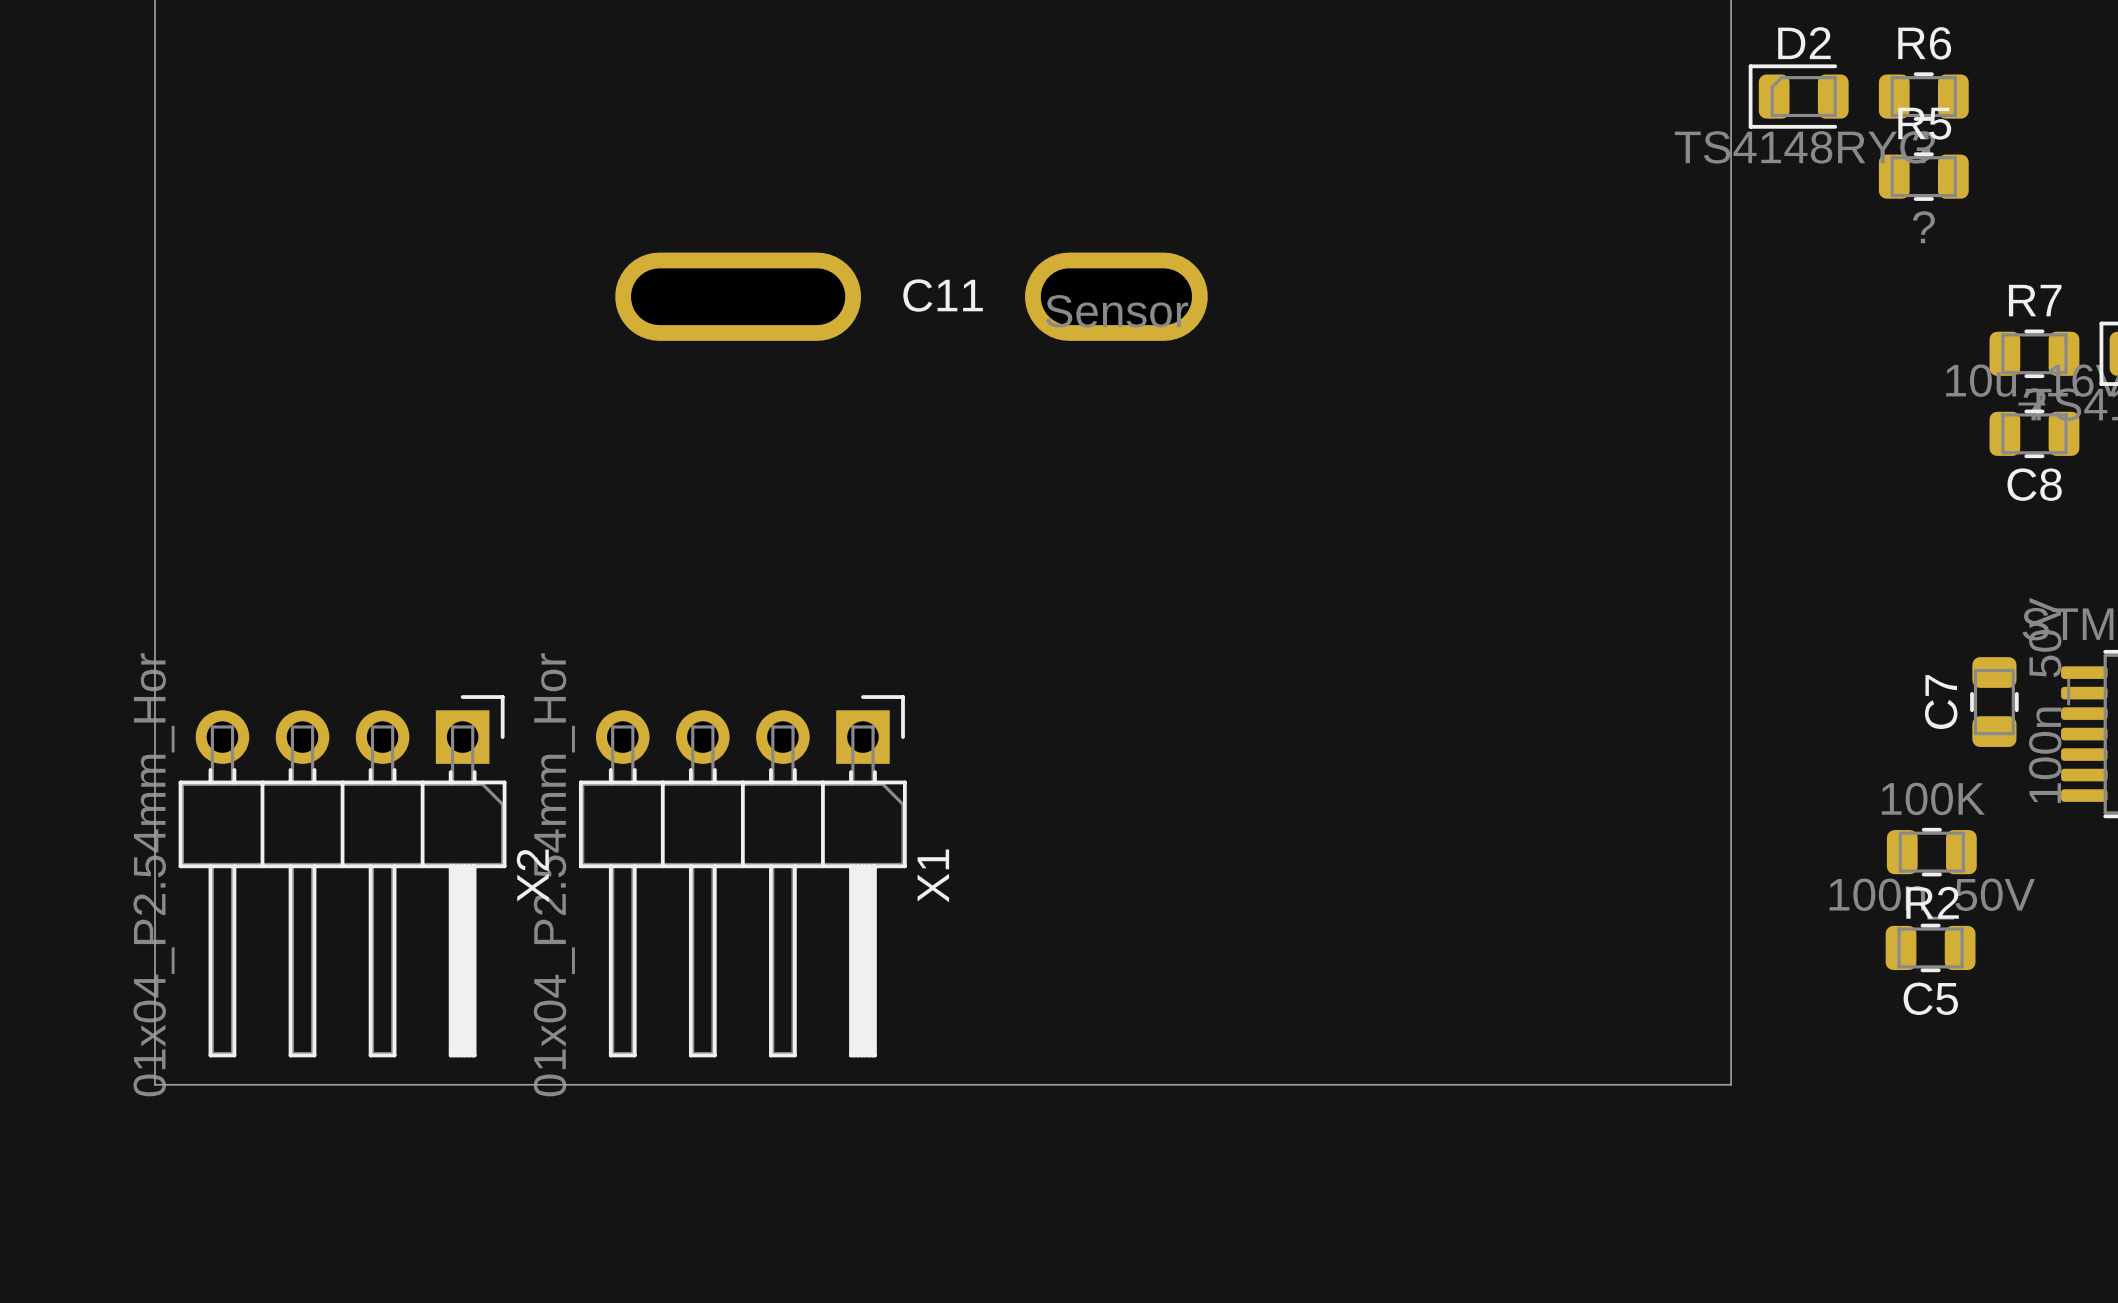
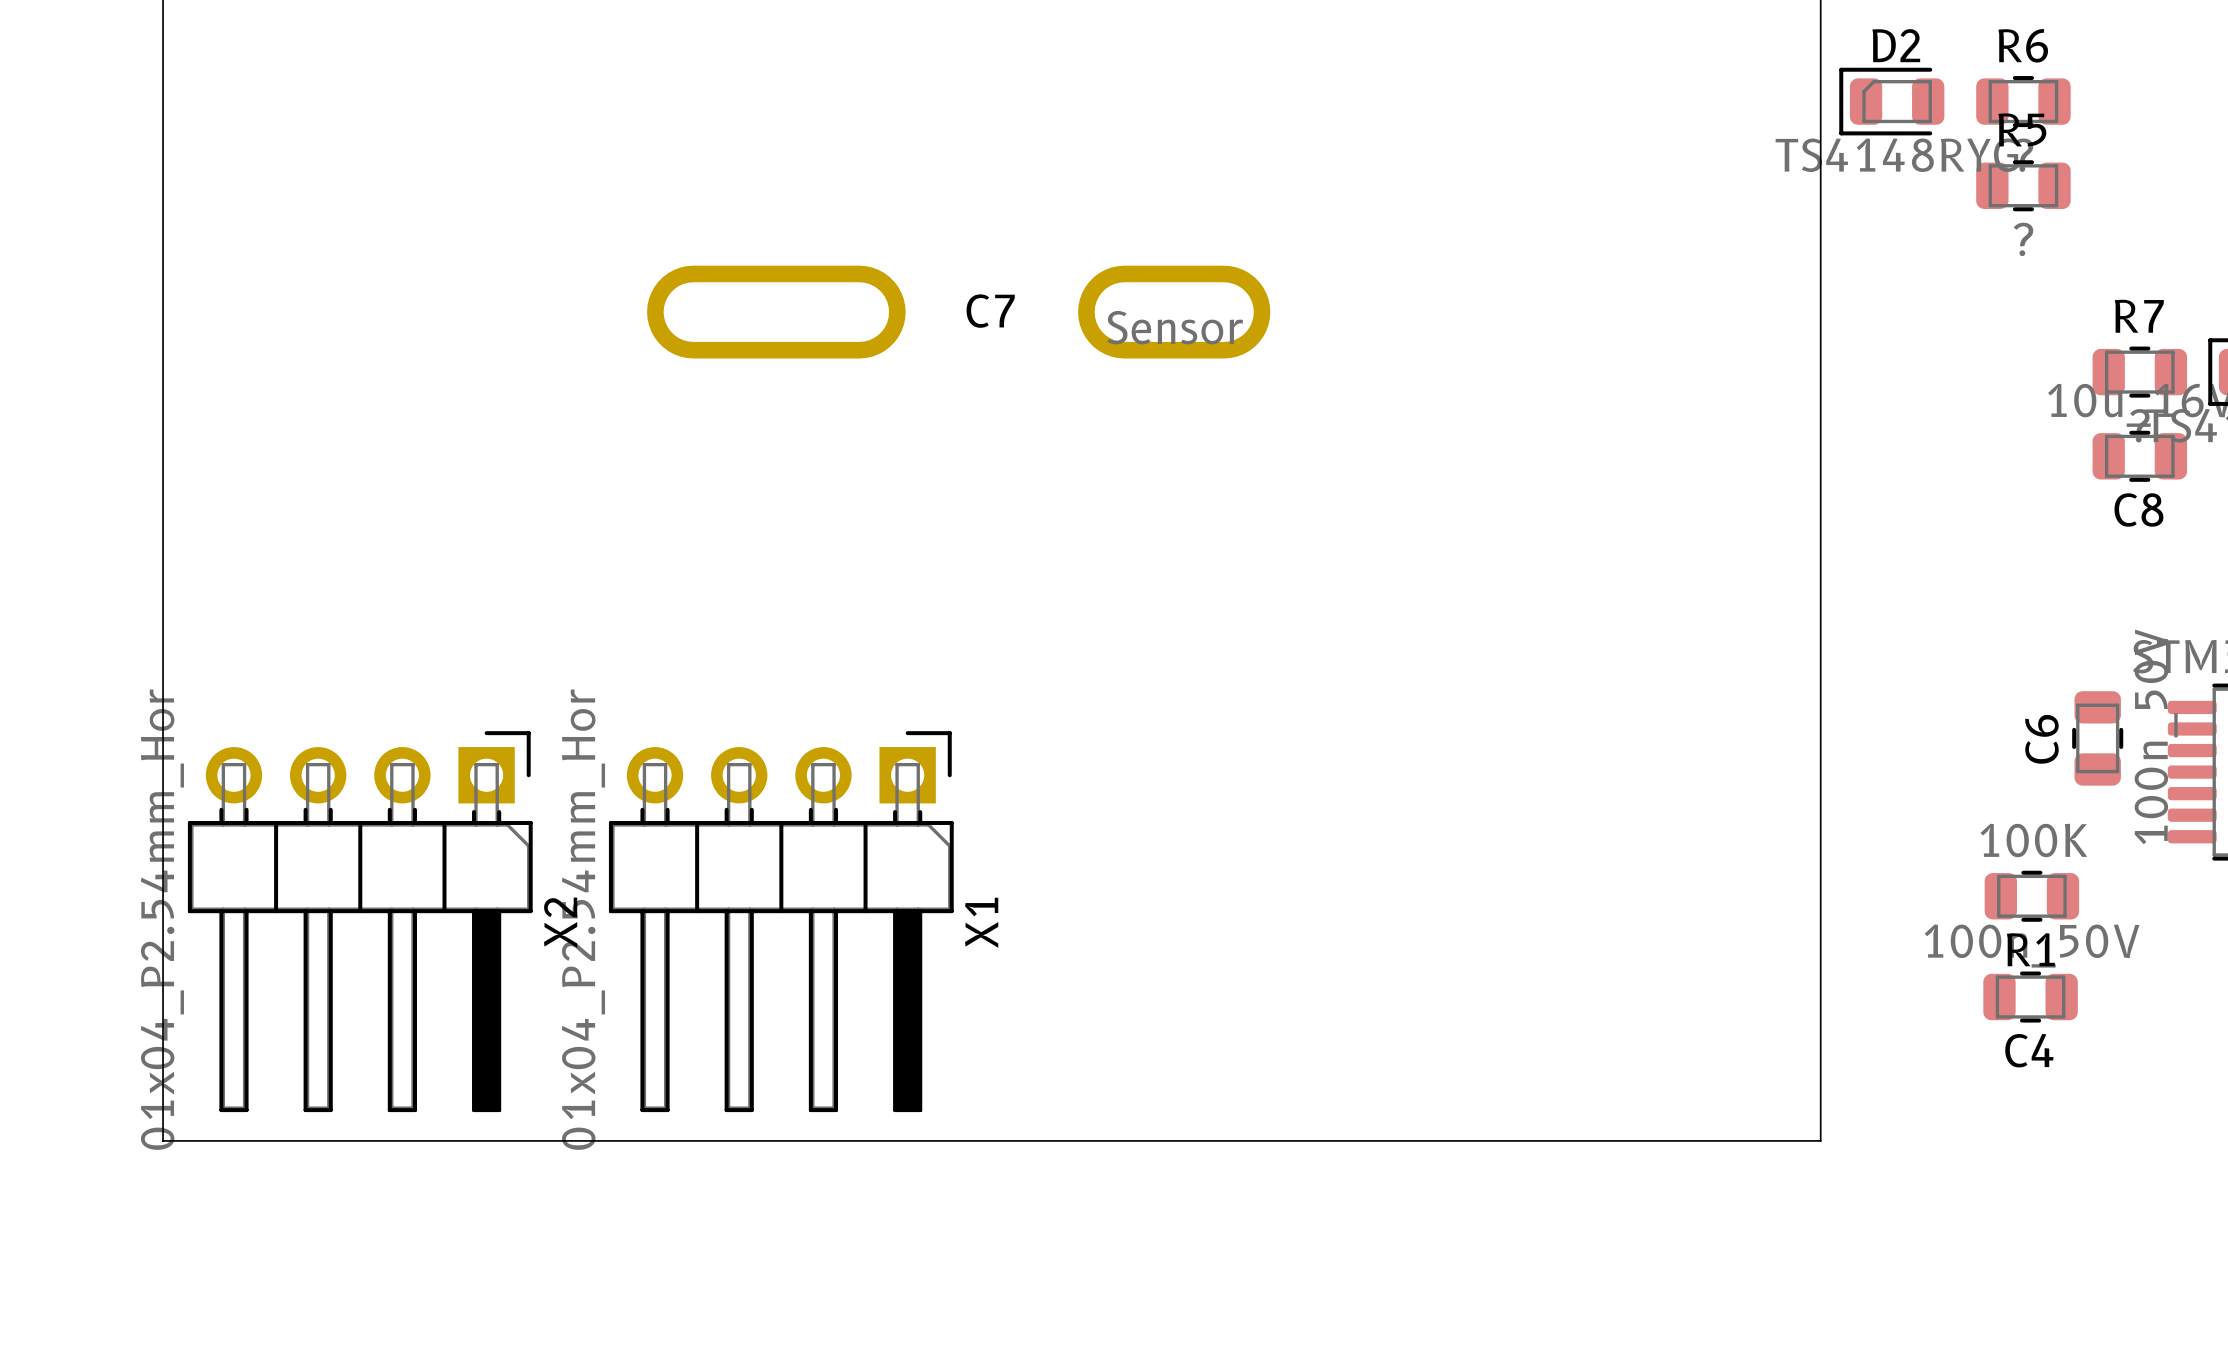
C11 name: C11 (943, 295) -> C7 (990, 311)
C7 name: C7 (1941, 702) -> C6 (2041, 739)
R2 name: R2 (1932, 902) -> R1 (2030, 949)
C5 name: C5 (1930, 998) -> C4 (2029, 1050)

